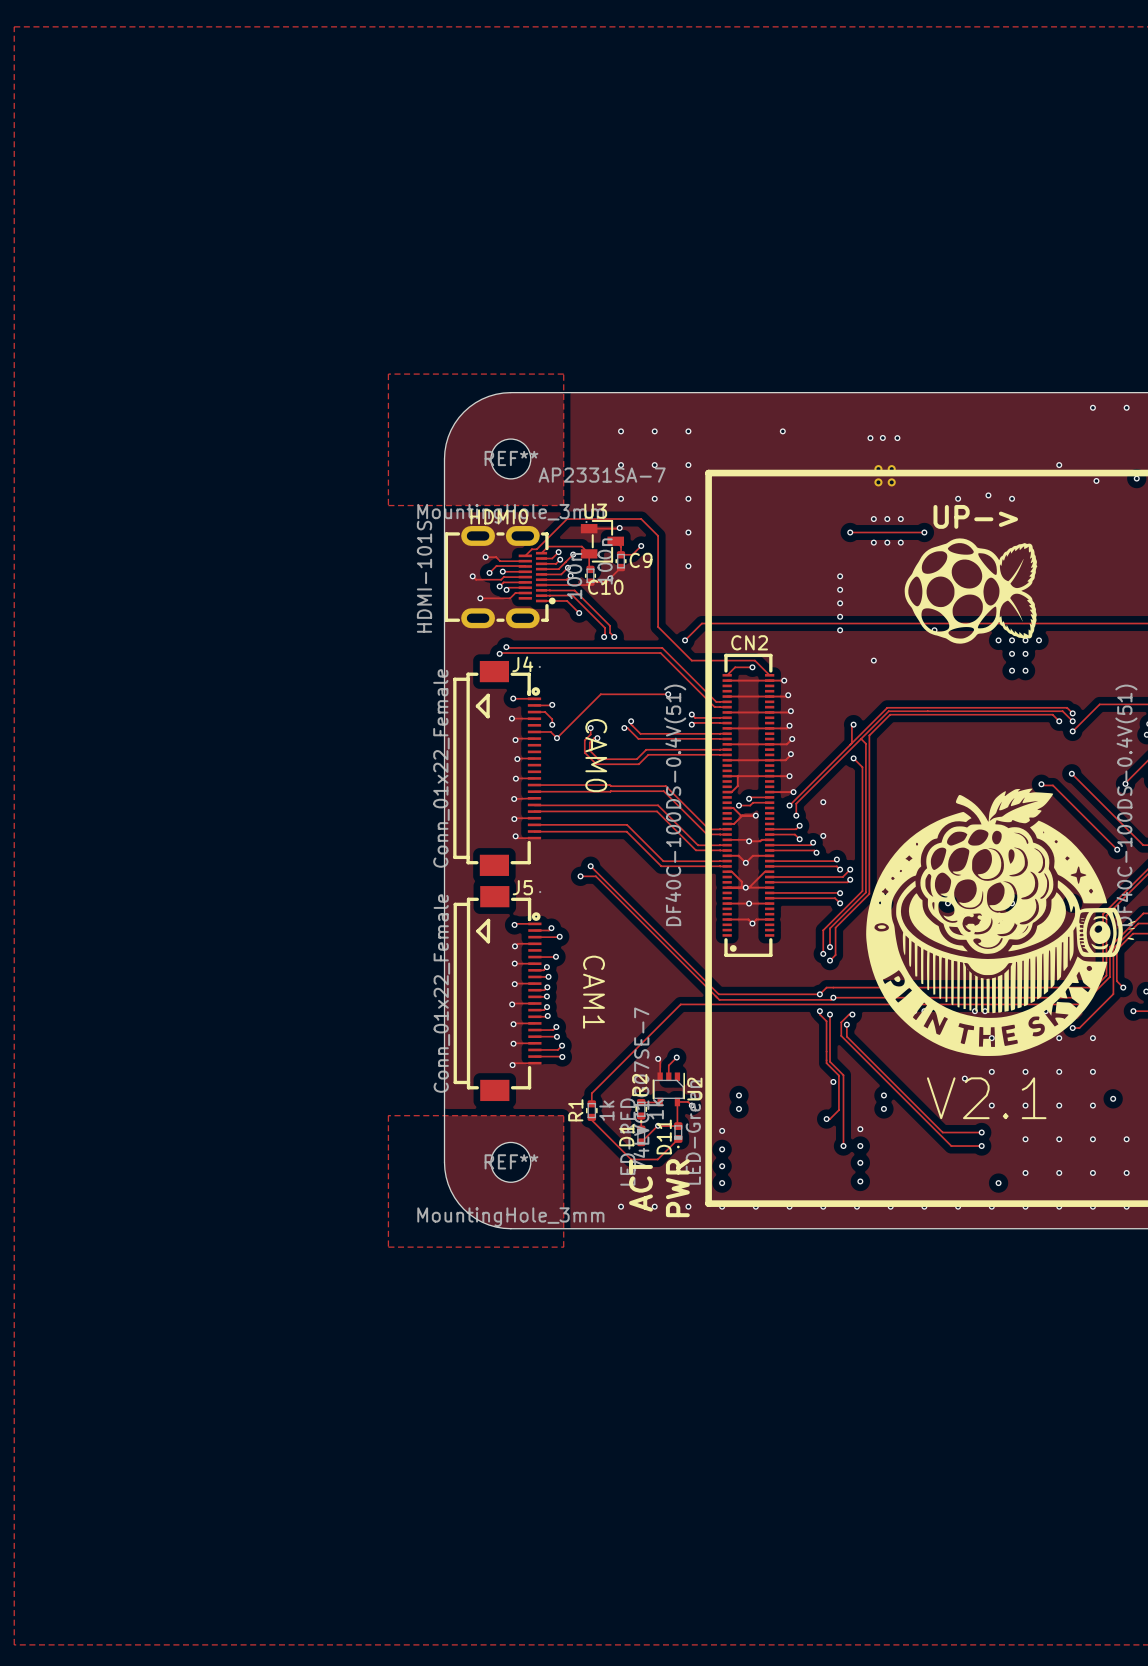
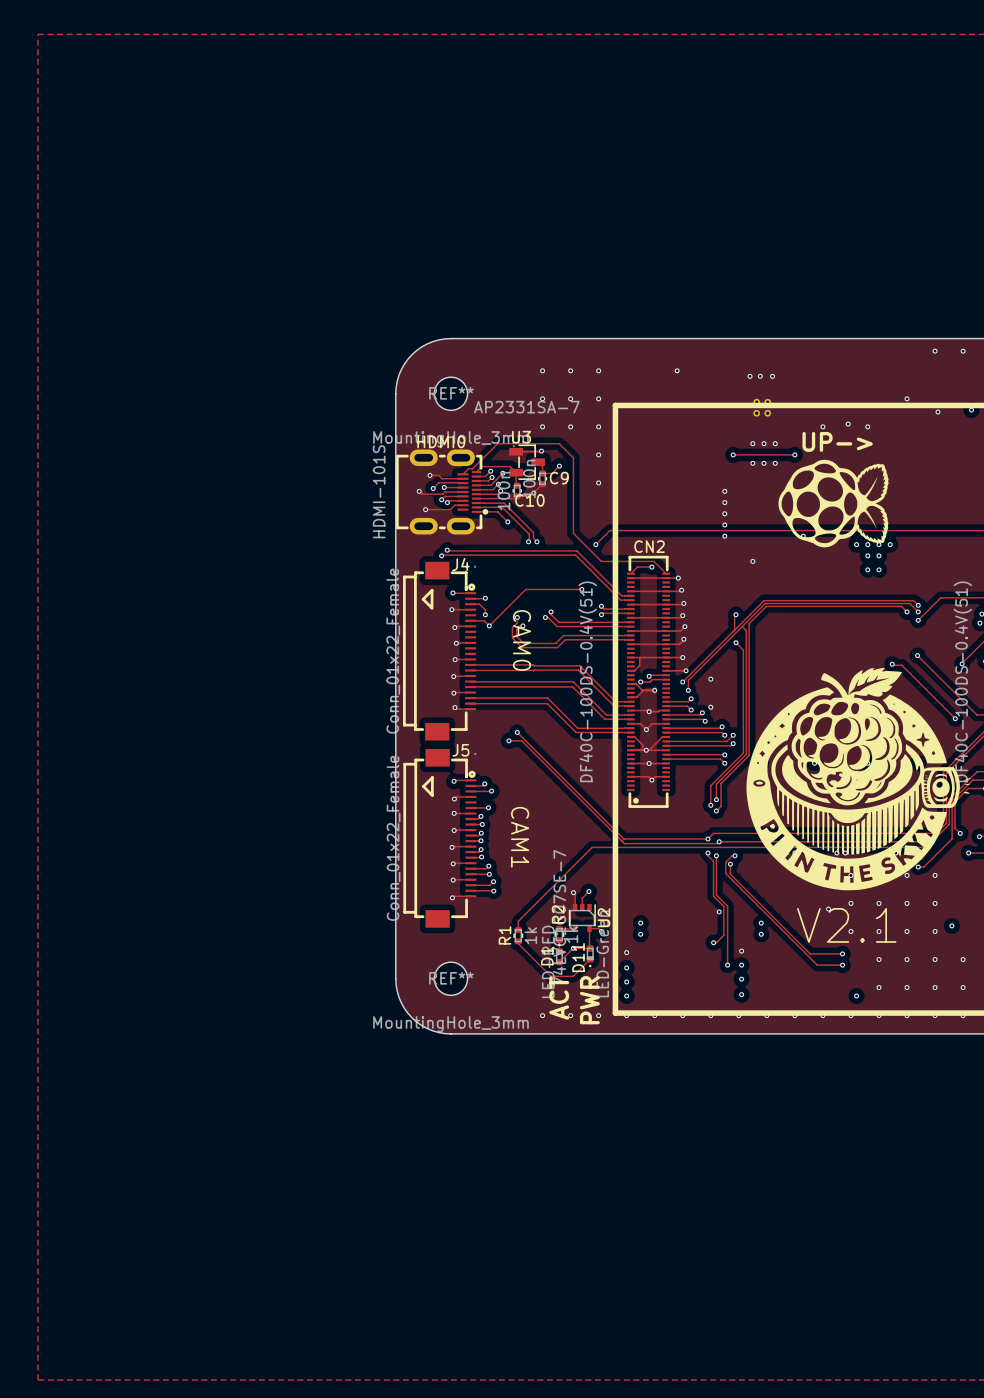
zone outline: (388, 374) (388, 505) (563, 505) (563, 374) (388, 374) -> none
zone outline: (388, 1115) (388, 1247) (563, 1247) (563, 1115) (388, 1115) -> none

